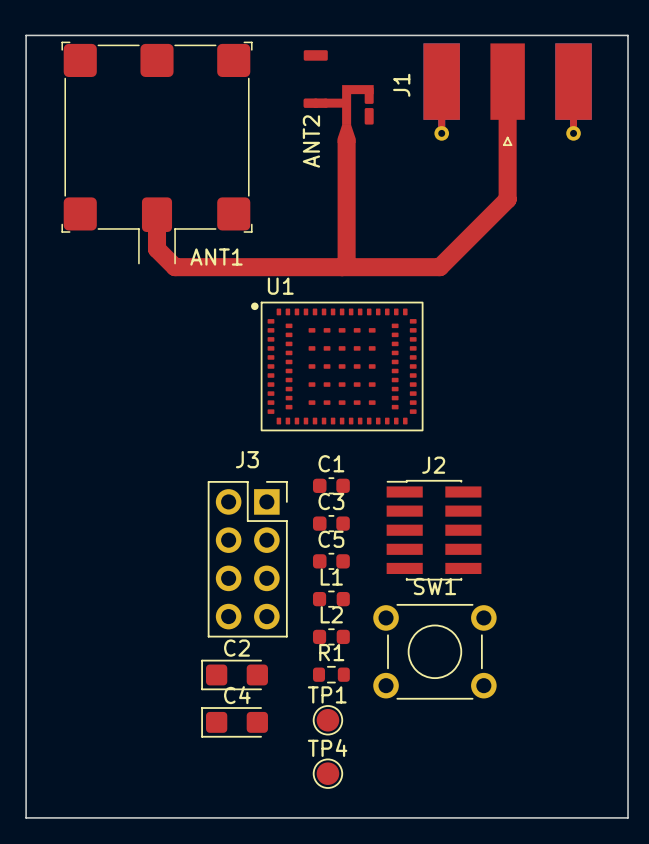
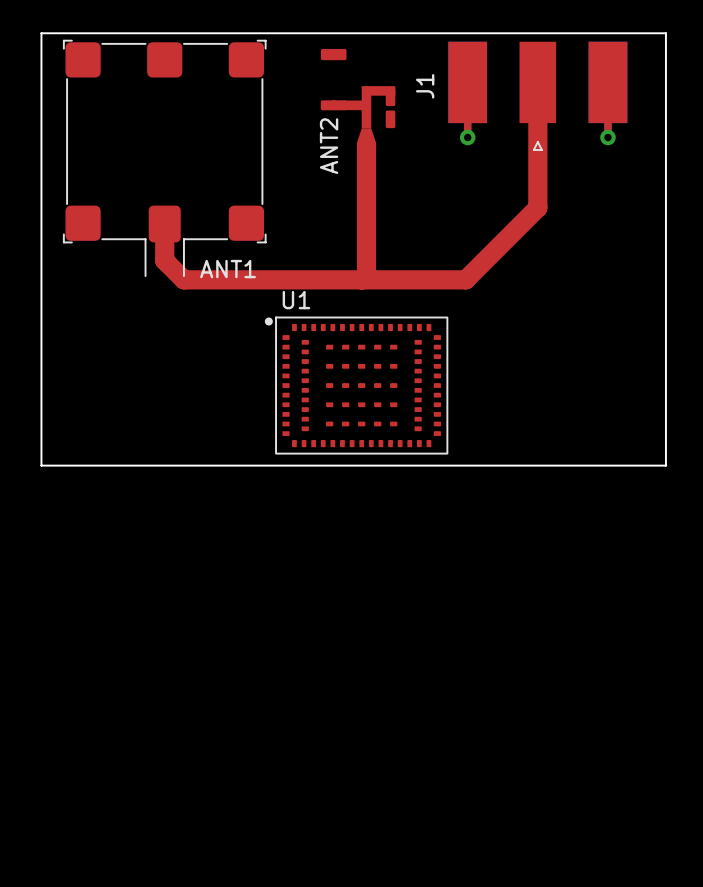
board edge: (41, 35) (26, 35) (26, 817) (628, 817) (628, 441) -> (41, 33) (41, 465) (665, 465)
C1: (331, 485) -> none
C3: (331, 523) -> none
J2: (434, 530) -> none
J3: (247, 559) -> none
C5: (331, 561) -> none
L1: (331, 599) -> none
L2: (331, 636) -> none
SW1: (434, 651) -> none
C2: (234, 674) -> none
R1: (331, 674) -> none
TP1: (327, 720) -> none
C4: (234, 722) -> none
TP4: (327, 773) -> none

